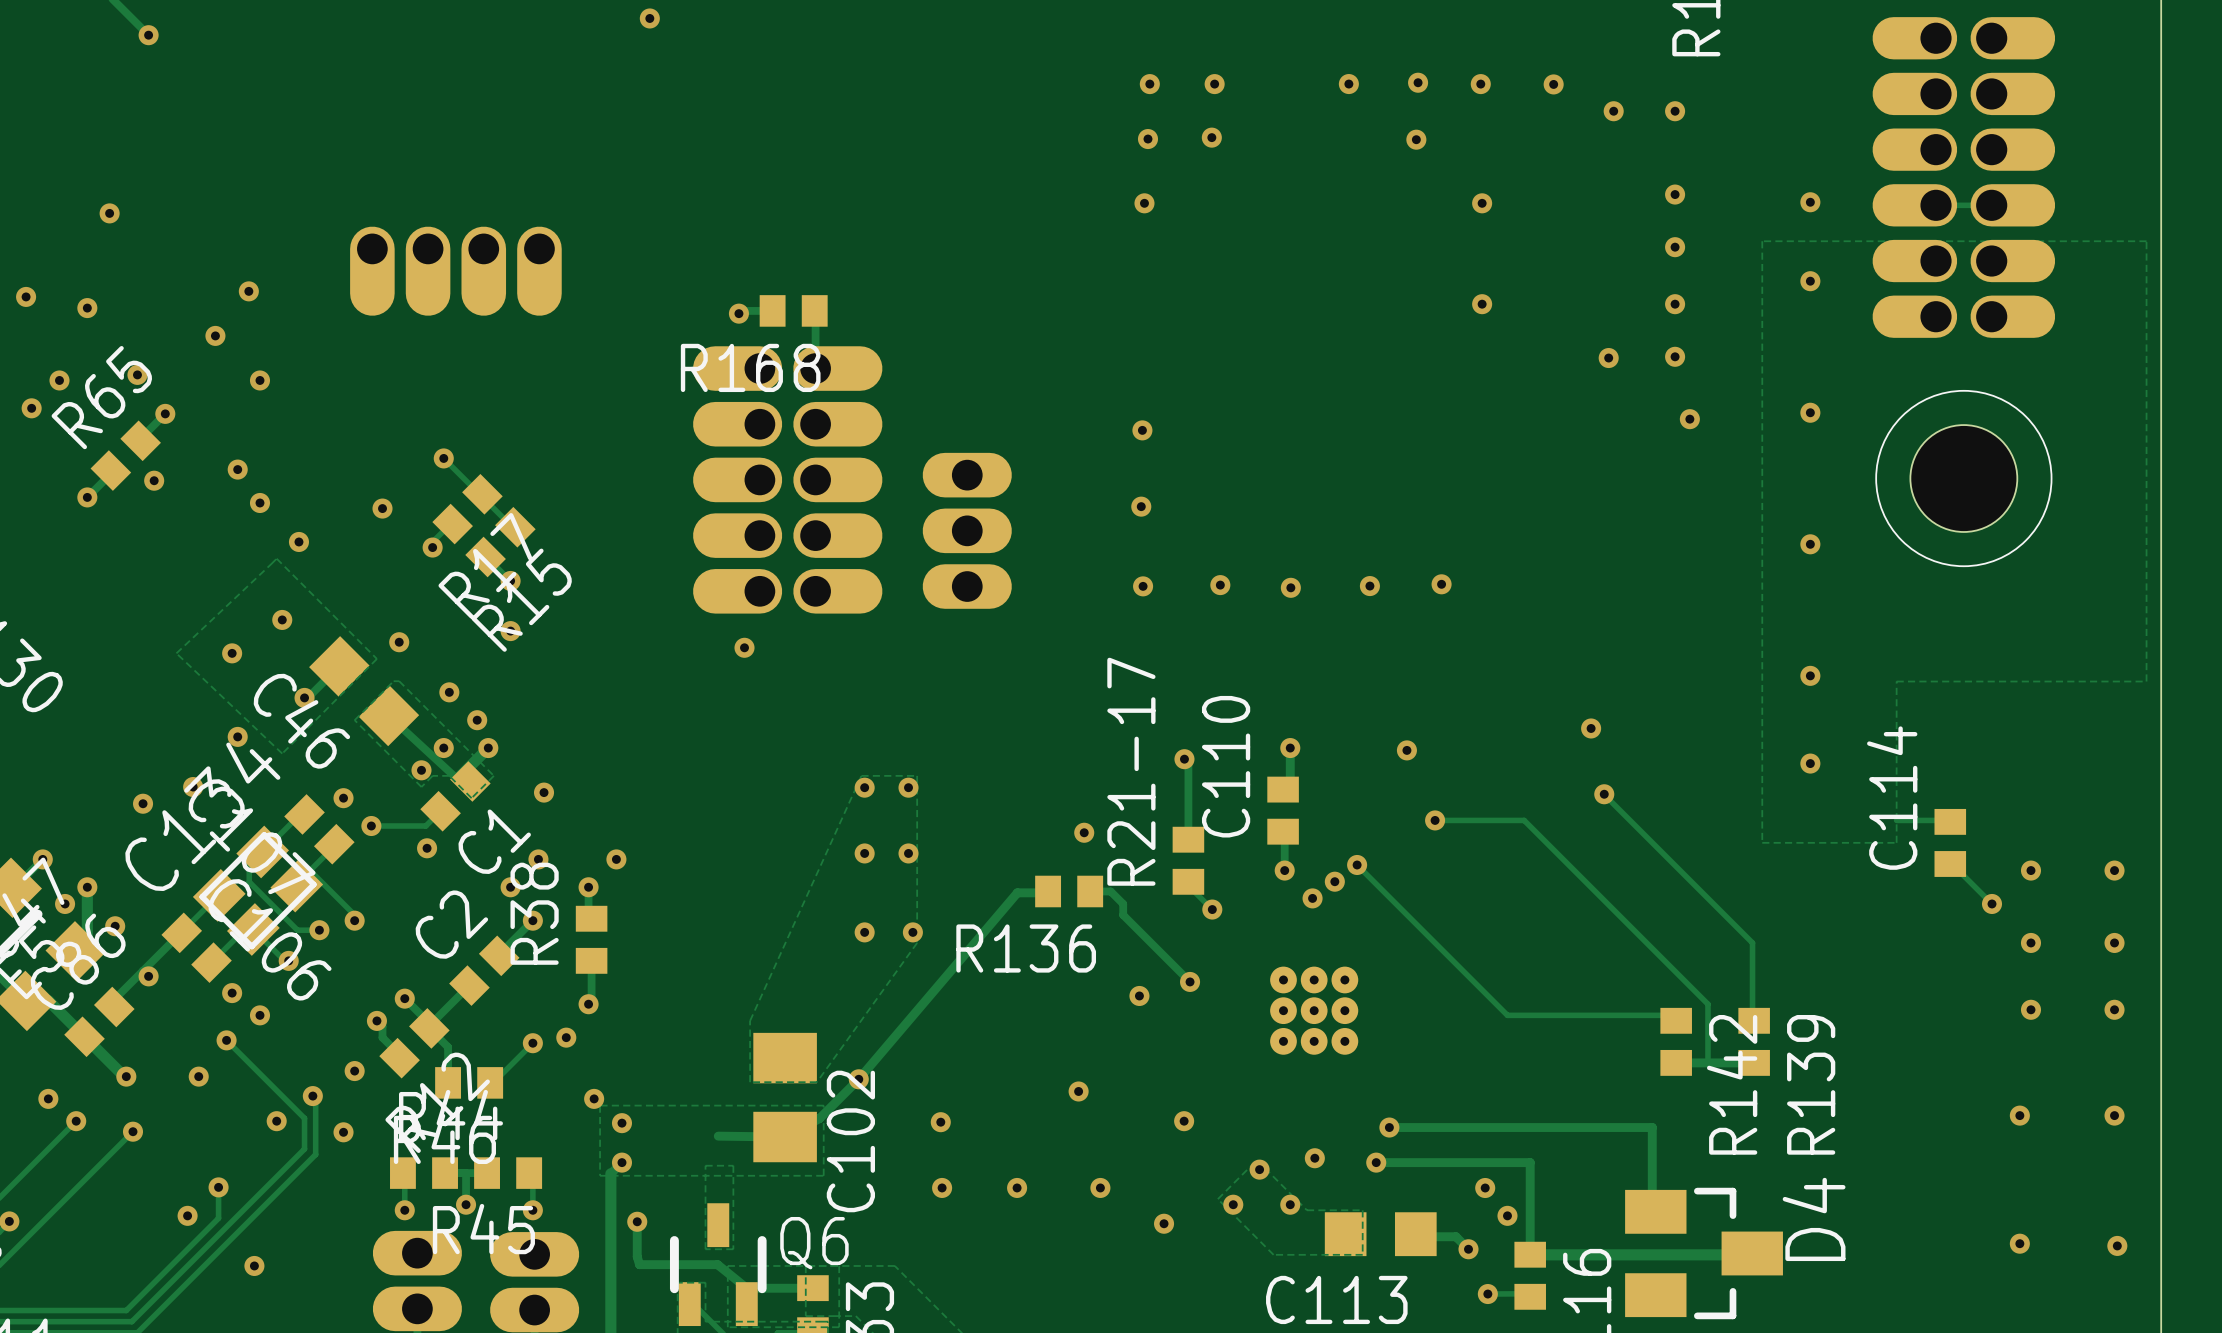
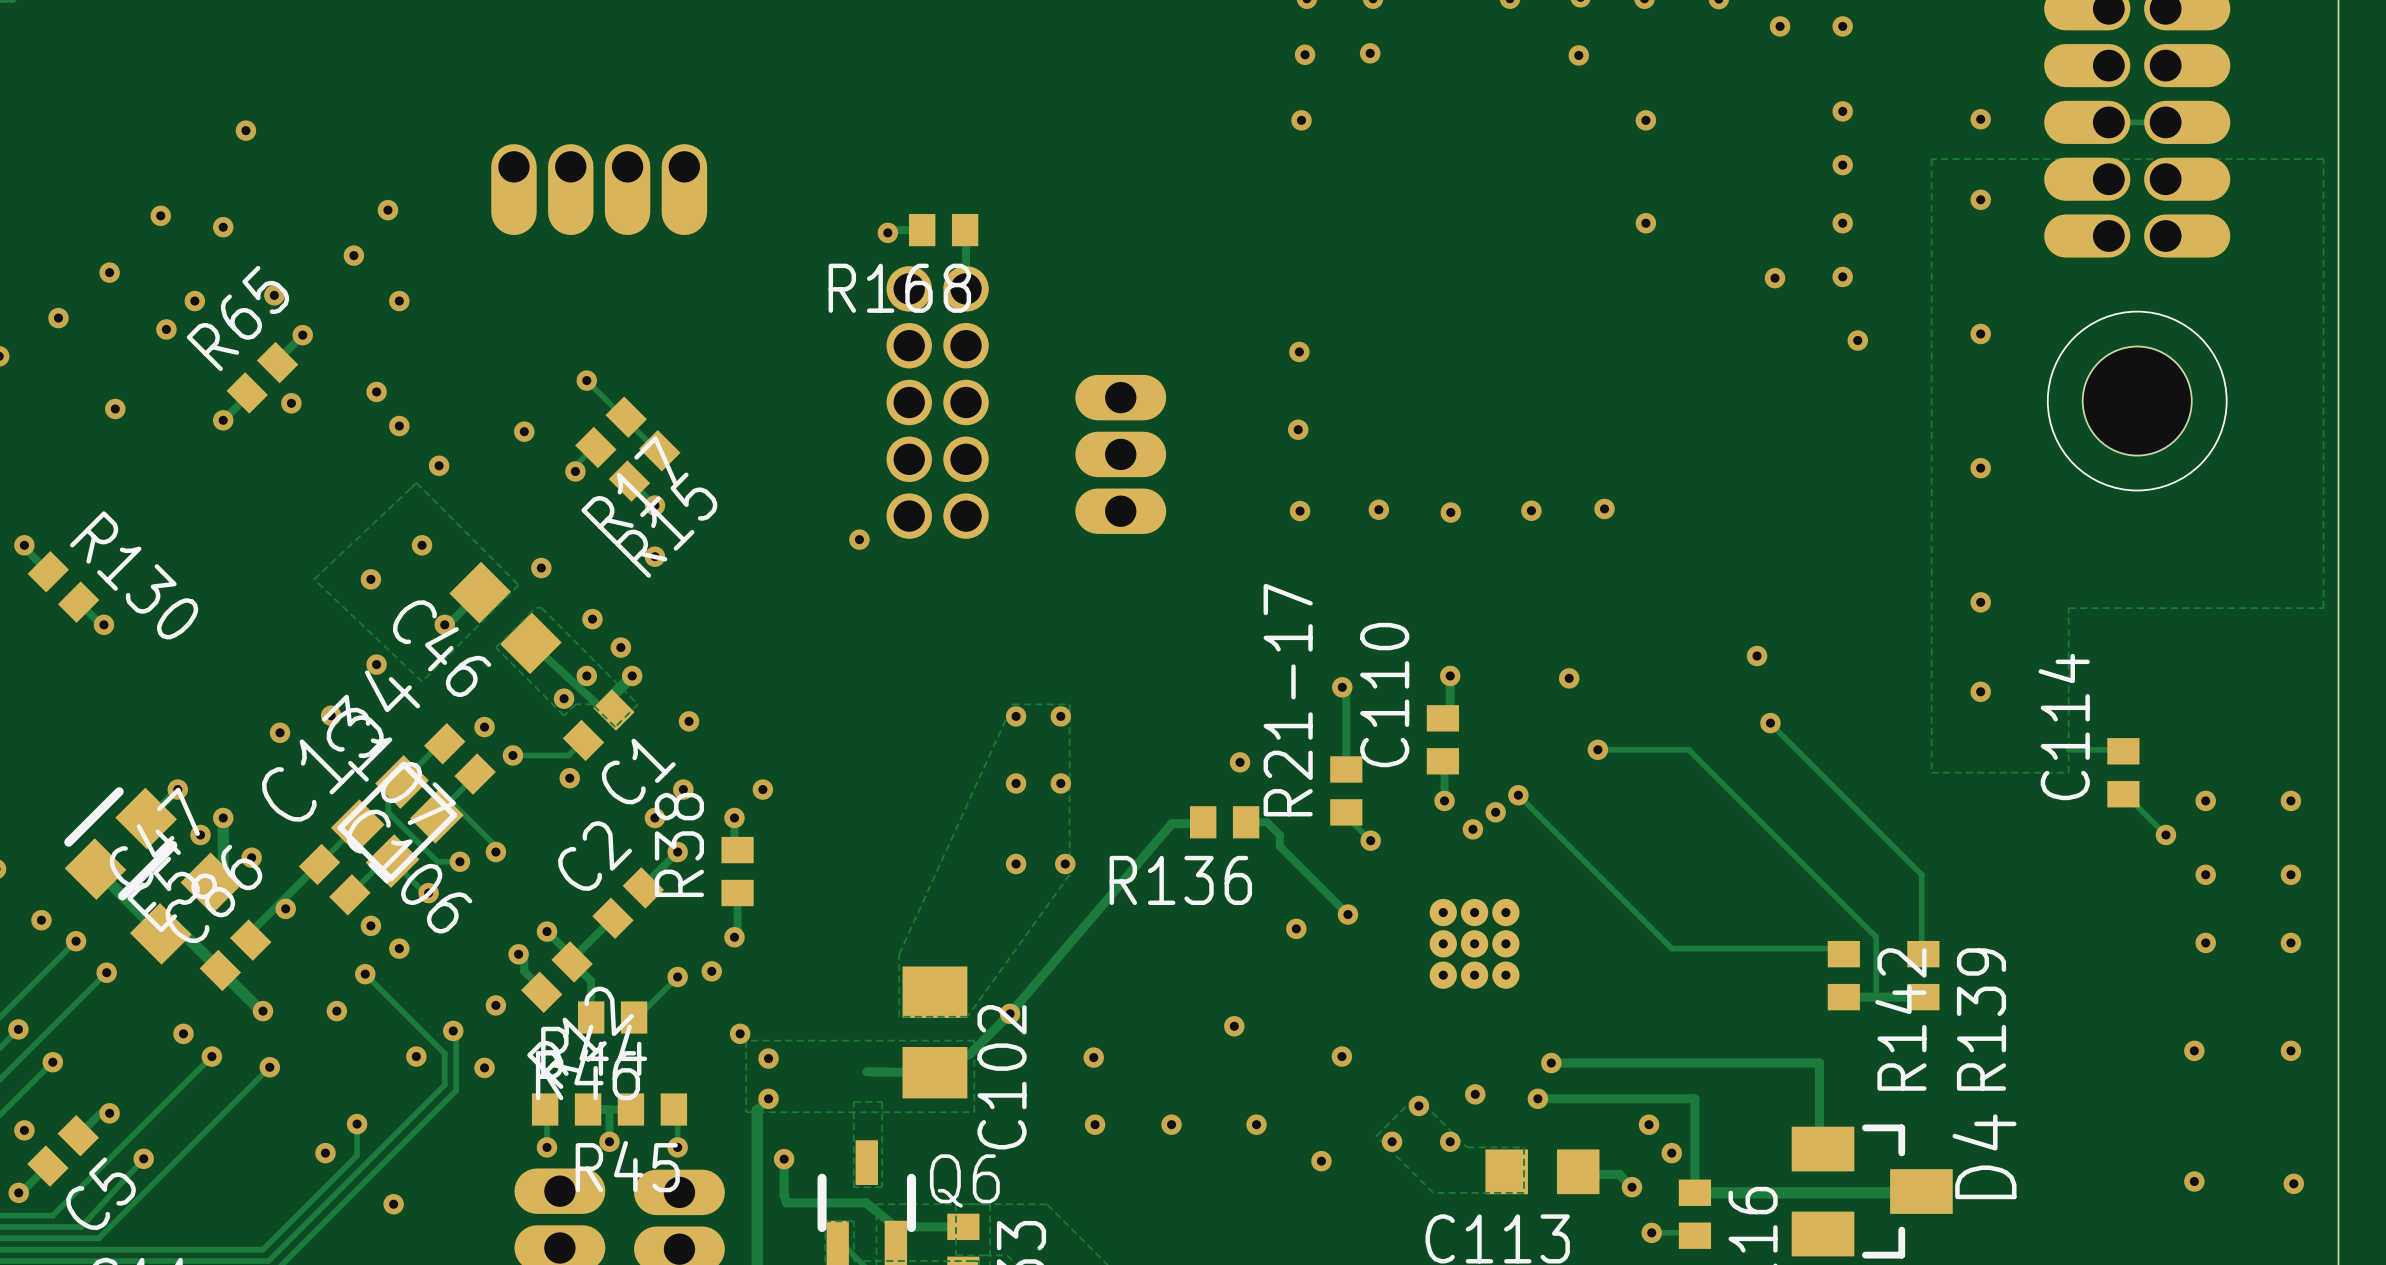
part footprint: [693, 346, 883, 614] -> [886, 266, 989, 539]
via position: (744, 647) -> (859, 539)

